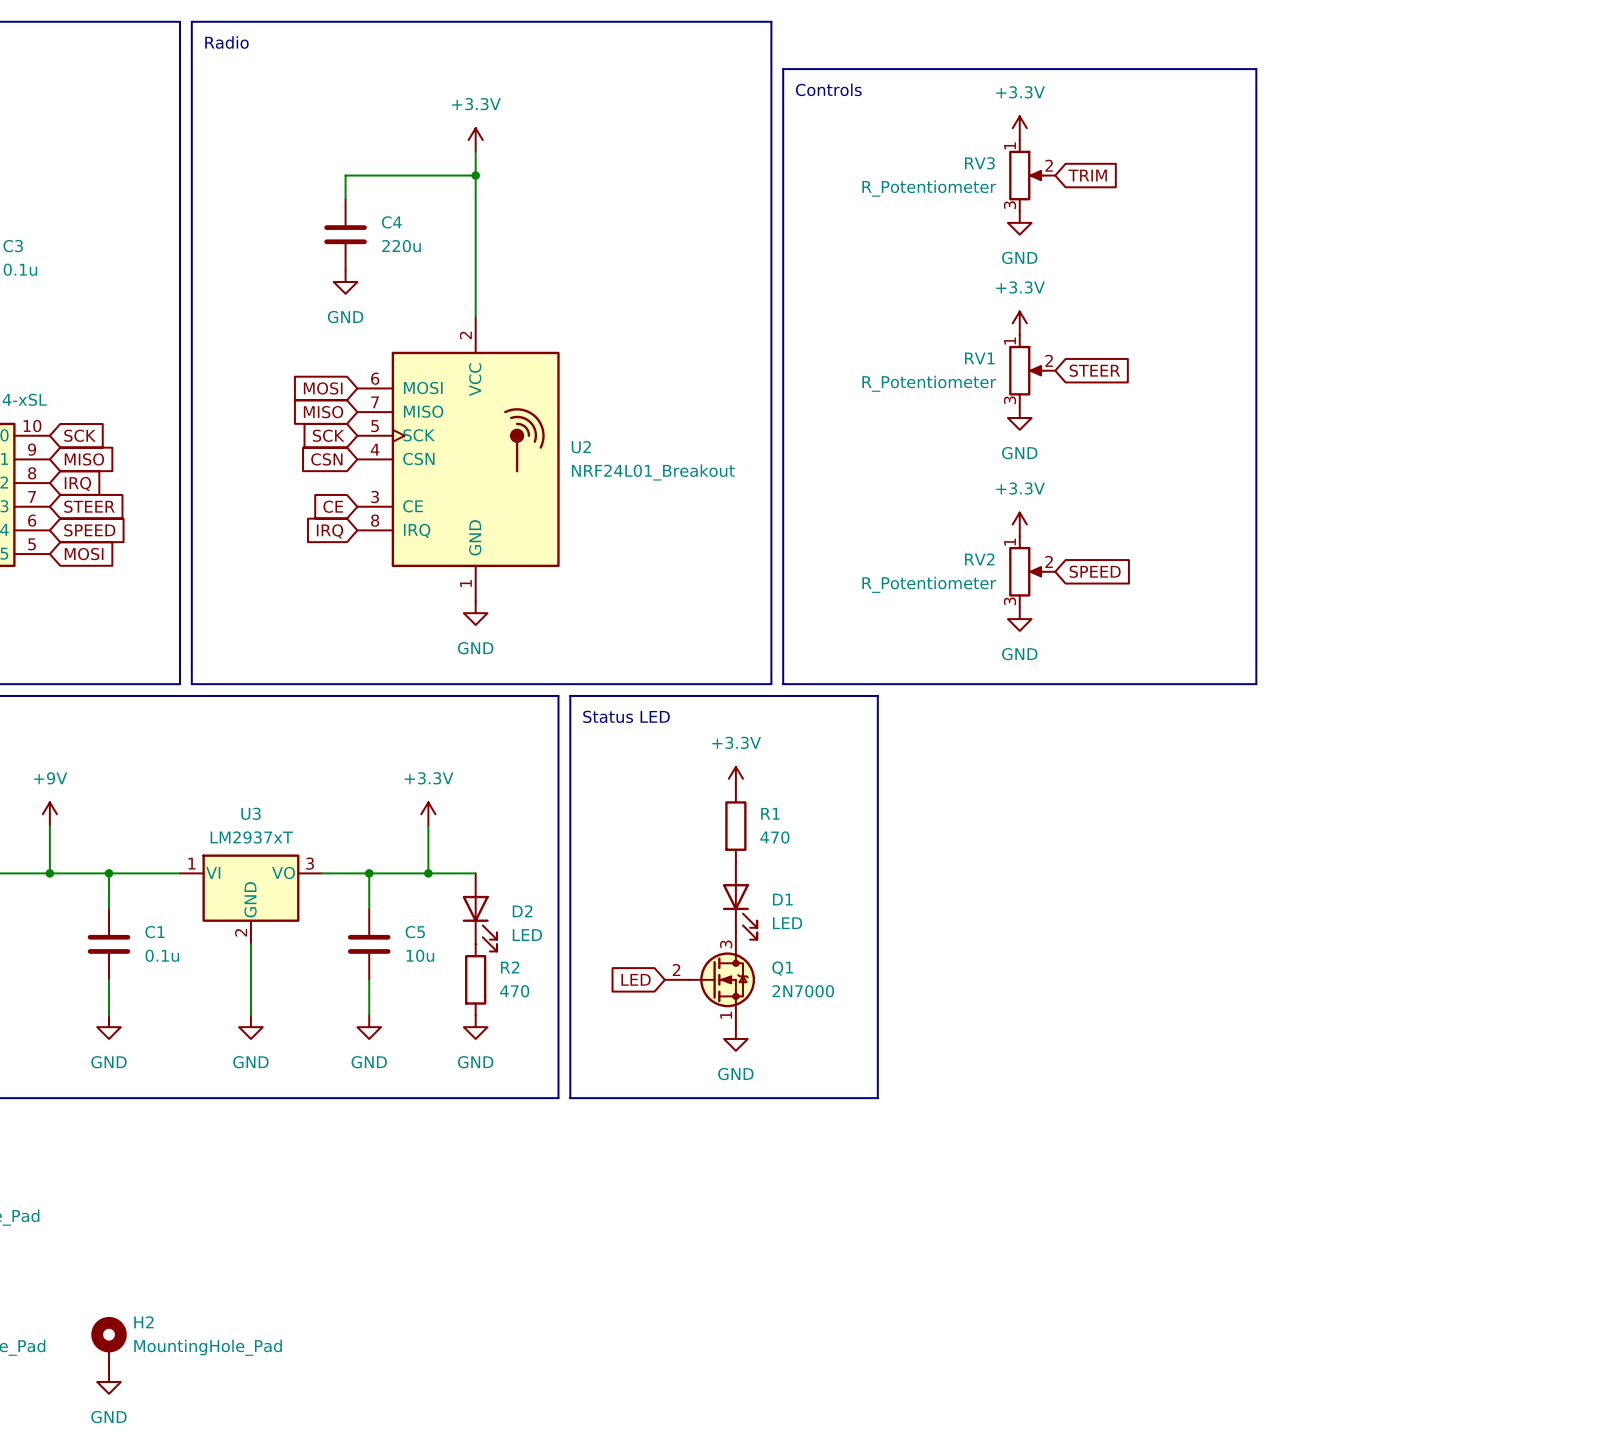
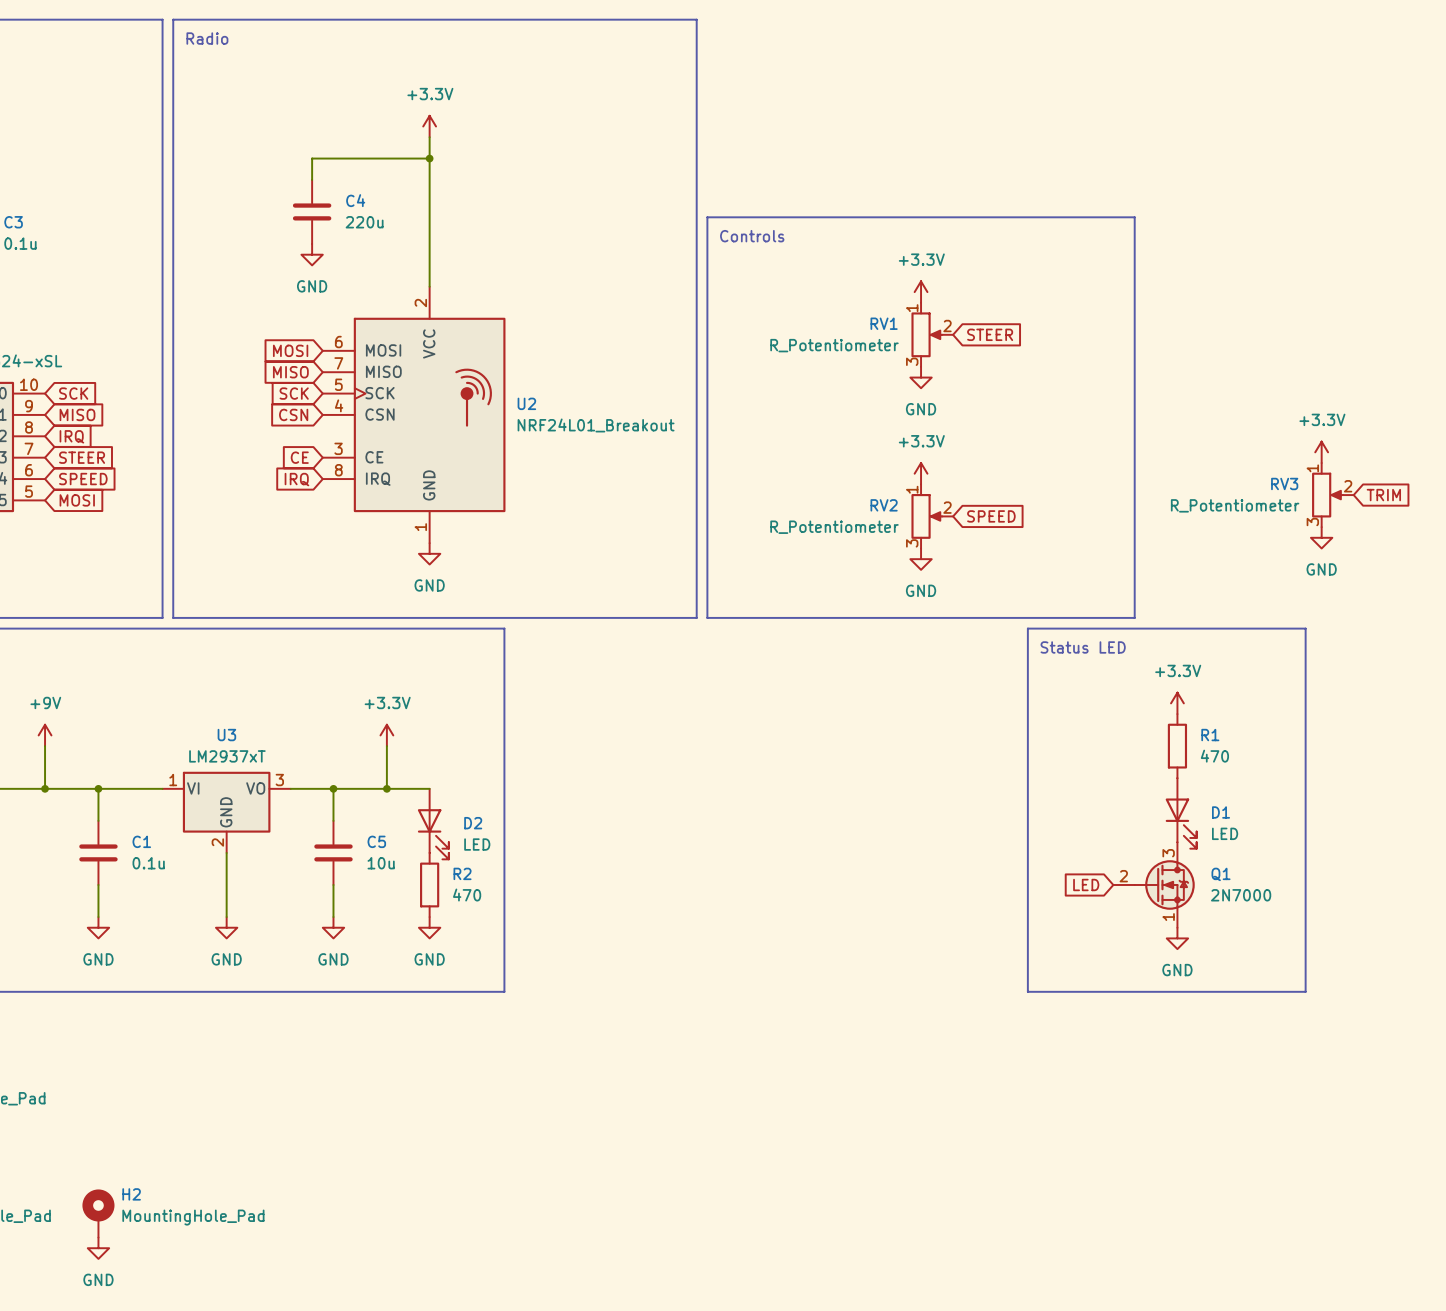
text position: Controls (828, 89) -> Controls (752, 236)
power symbol: +3.3V (1019, 128) -> none
RV3 position: (1032, 175) -> (1332, 495)
global label: TRIM (1087, 175) -> none
power symbol: GND (1019, 222) -> none
line: (783, 240) (783, 69) (1256, 69) (1256, 240) -> (707, 217) (1134, 217)
power symbol: none -> +3.3V (1321, 452)
global label: none -> TRIM (1383, 495)
power symbol: none -> GND (1321, 537)
line: (570, 695) (877, 695) (877, 1098) (570, 1098) (570, 695) -> none
line: none -> (1027, 628) (1305, 628) (1305, 991) (1027, 991) (1027, 628)
text: Status LED (626, 716) -> none
text: none -> Status LED (1083, 647)
power symbol: +3.3V (735, 778) -> none
power symbol: none -> +3.3V (1177, 703)
R1 position: (735, 826) -> (1177, 746)
D1 position: (740, 900) -> (1181, 813)
global label: LED (636, 979) -> none
Q1 position: (709, 979) -> (1154, 884)
global label: none -> LED (1086, 884)
power symbol: GND (735, 1038) -> none
power symbol: none -> GND (1177, 938)

